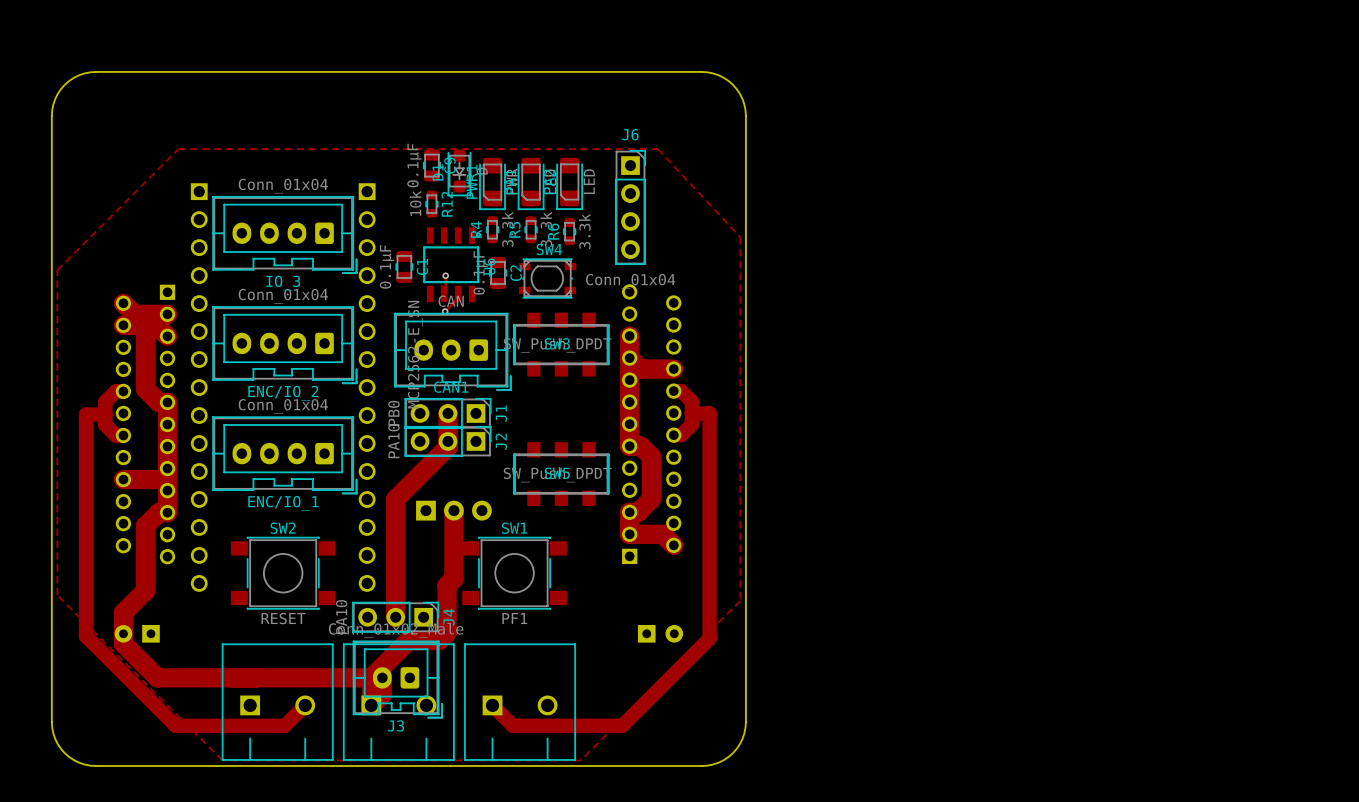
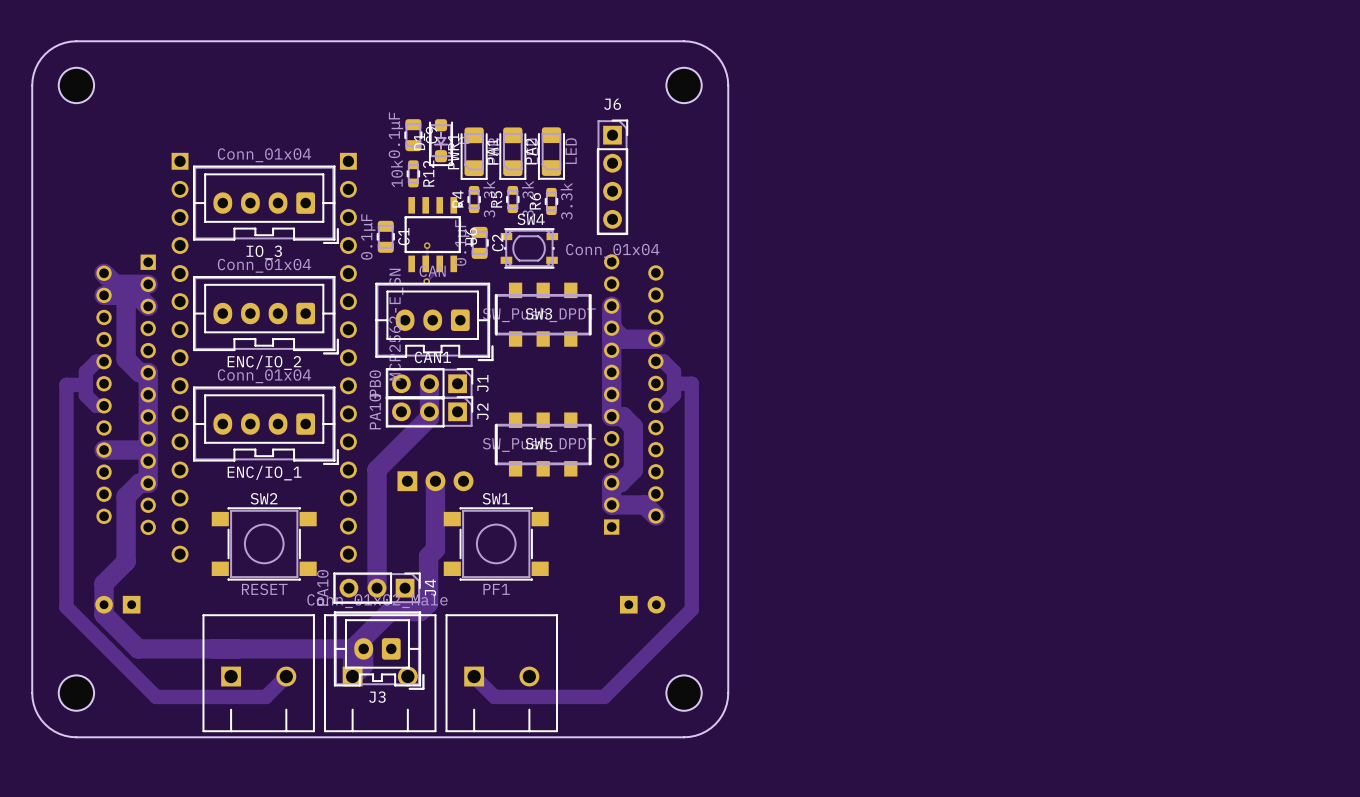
part: none -> (76, 85)
part: none -> (684, 85)
zone outline: (178, 149) (57, 270) (57, 595) (222, 760) (580, 760) (740, 600) (740, 237) (657, 149) (178, 149) -> none
part: none -> (76, 693)
part: none -> (684, 693)

